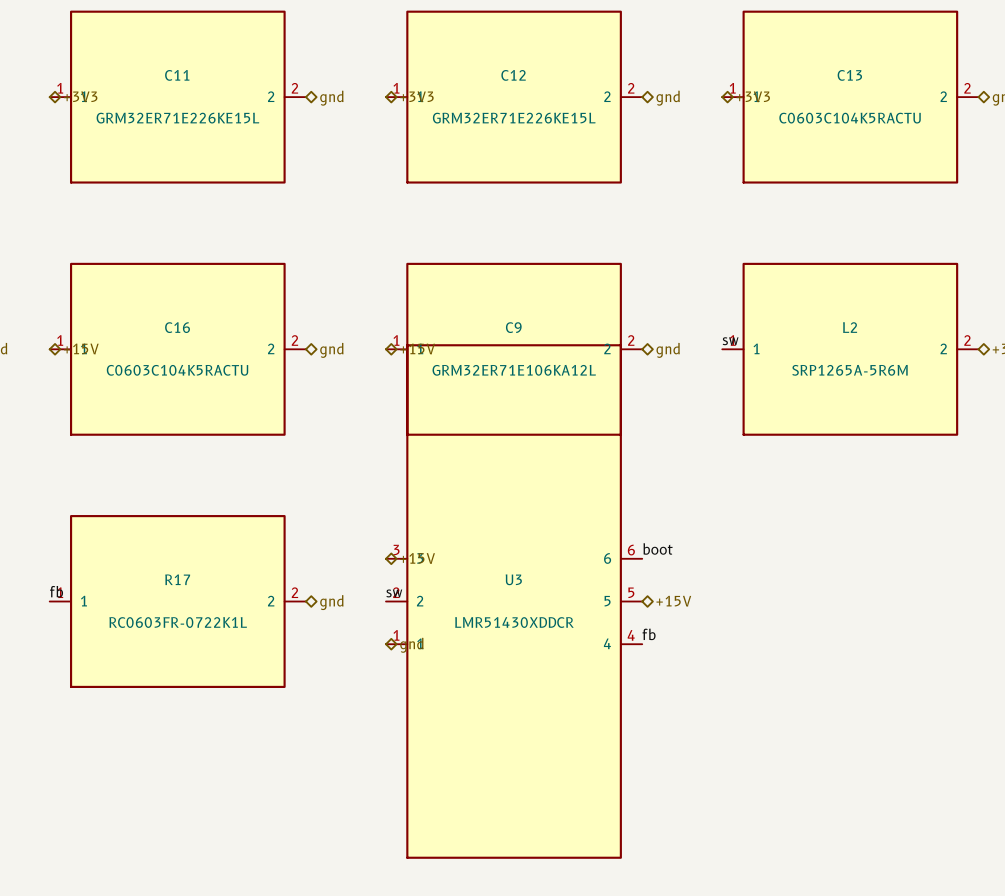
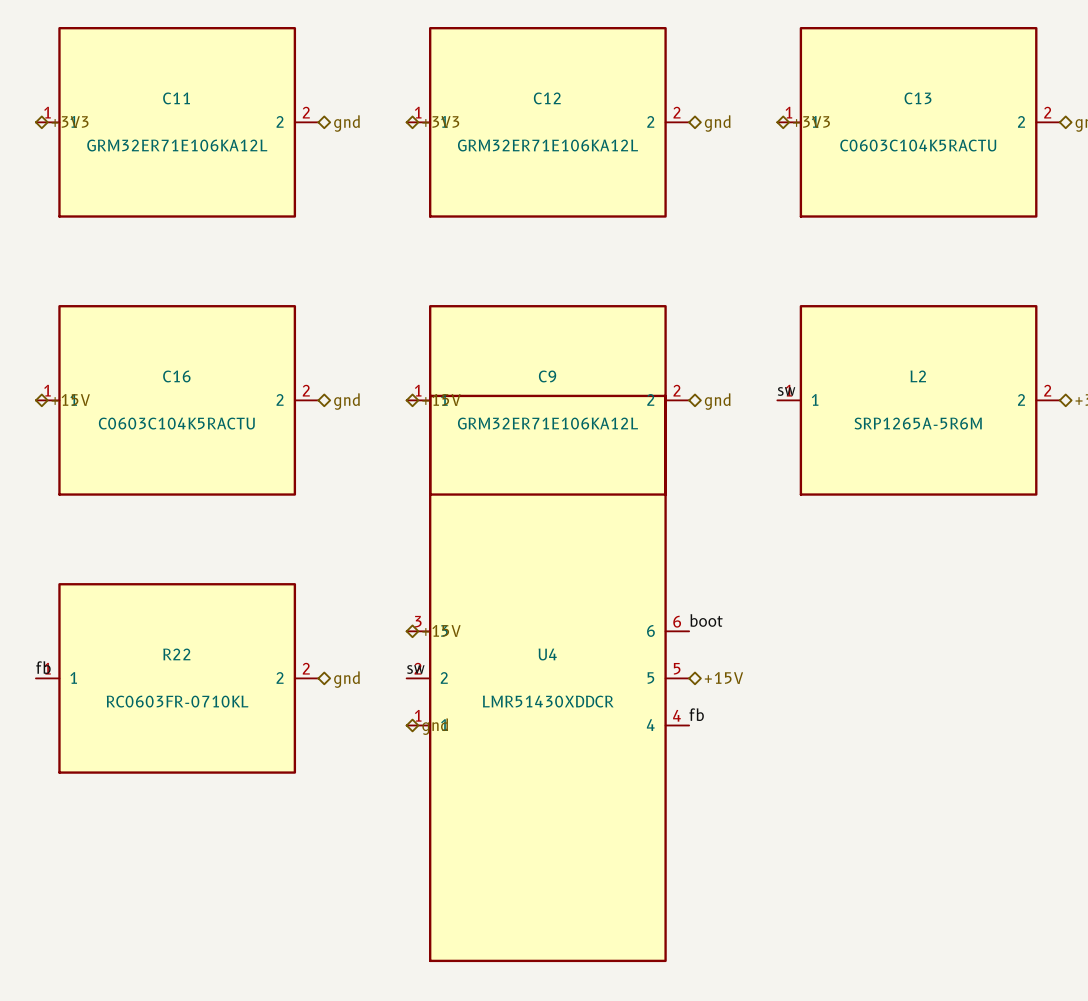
C11 value: GRM32ER71E226KE15L (177, 118) -> GRM32ER71E106KA12L (177, 145)
C12 value: GRM32ER71E226KE15L (514, 118) -> GRM32ER71E106KA12L (547, 145)
R17 name: R17 (177, 579) -> R22 (176, 654)
U3 name: U3 (513, 579) -> U4 (547, 654)
R17 value: RC0603FR-0722K1L (178, 622) -> RC0603FR-0710KL (177, 701)

